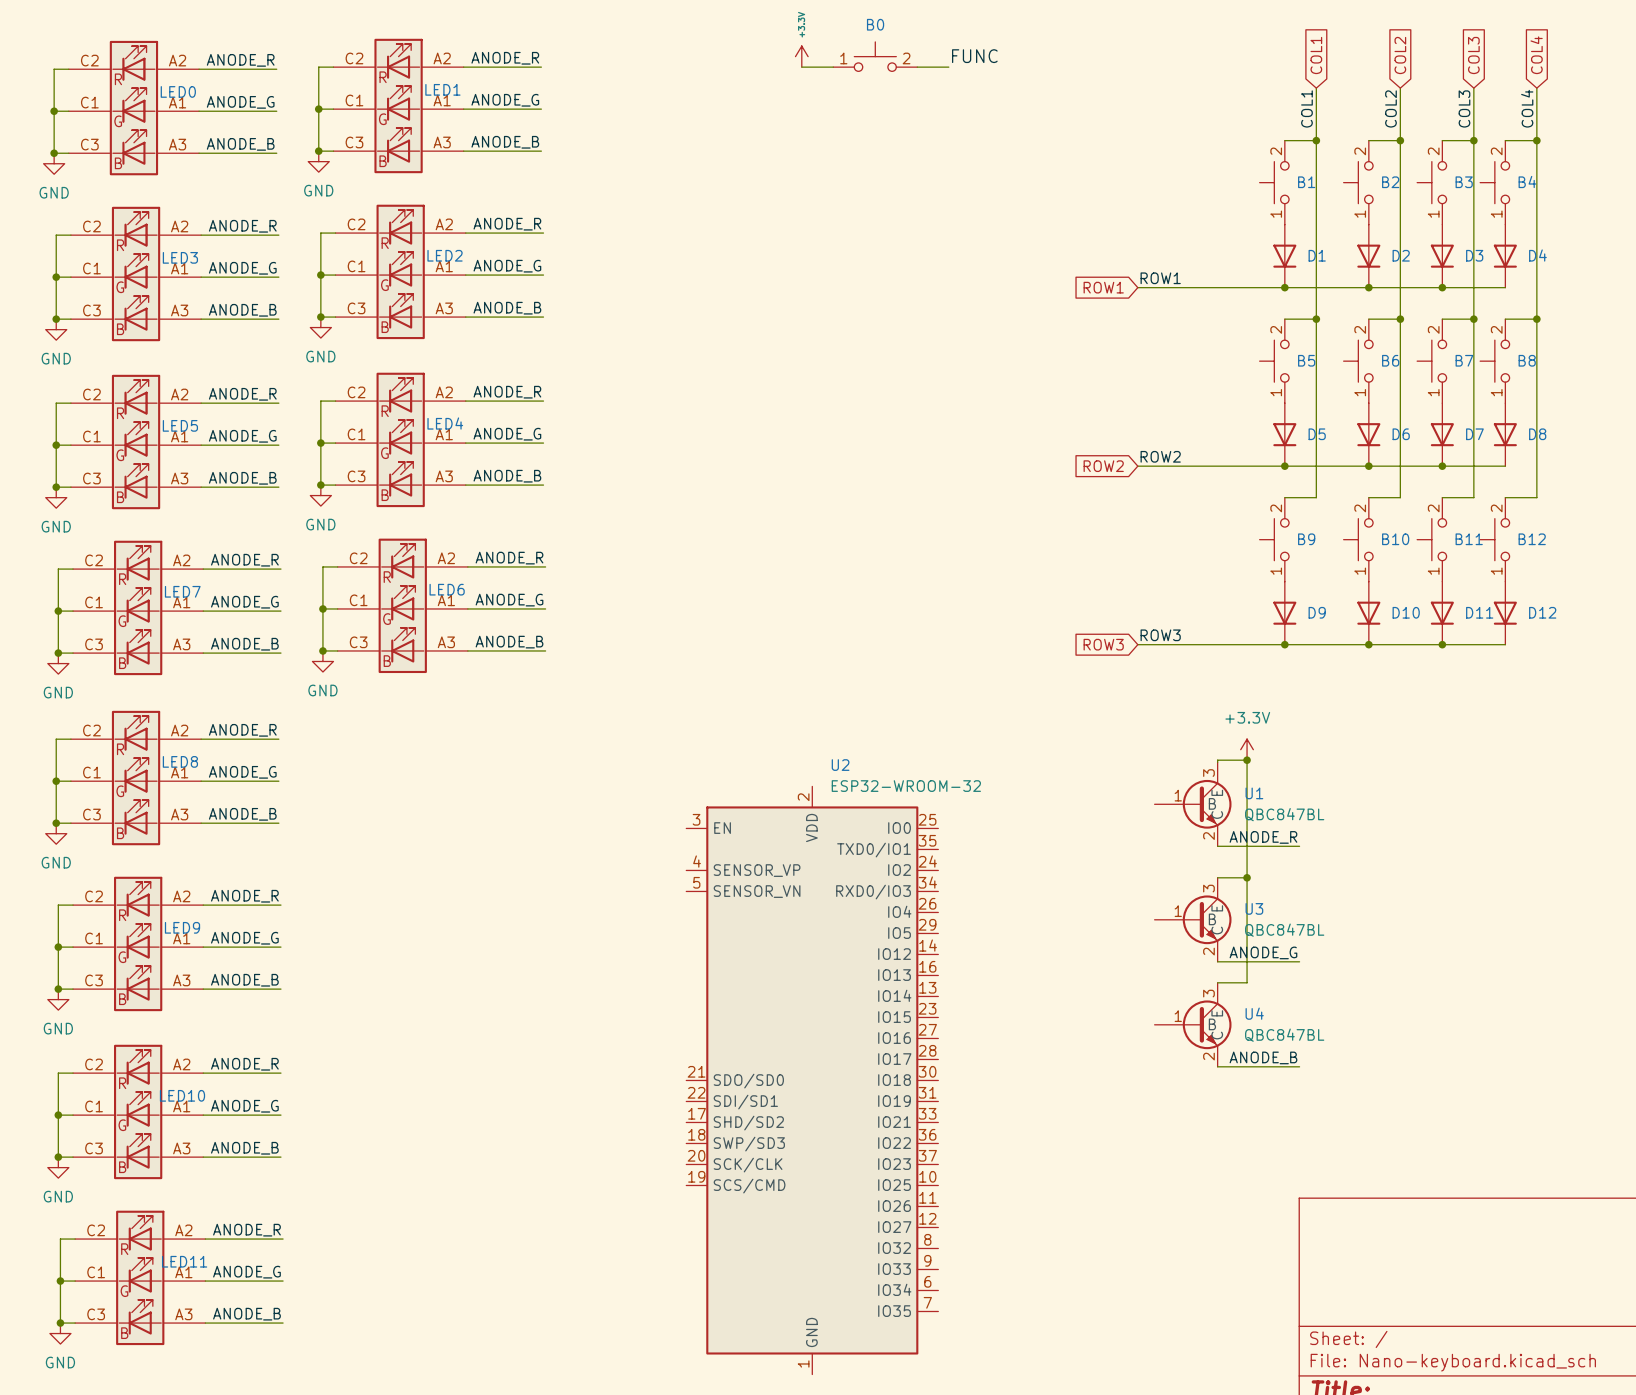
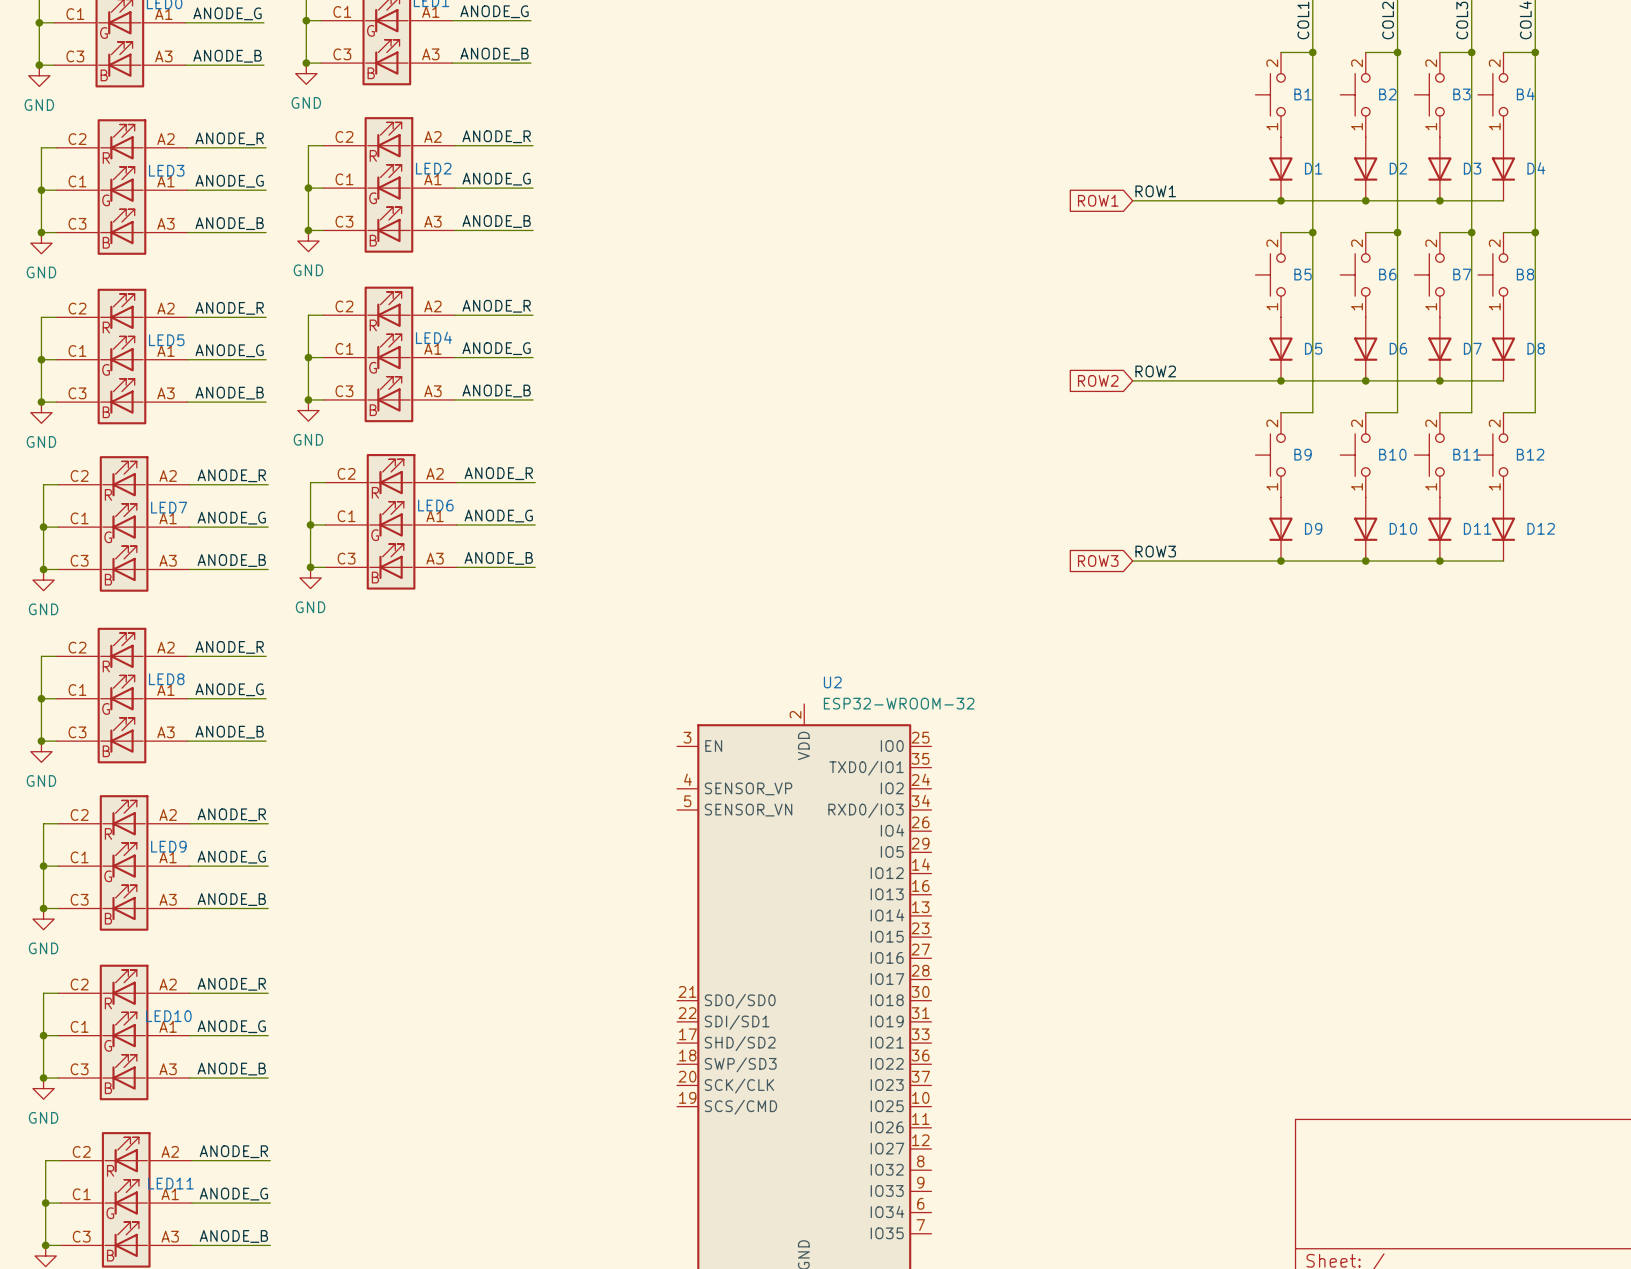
power symbol: +3.3V (1247, 749) -> none
junction: (1247, 760) -> none
wire: (1217, 762) (1217, 760) (1247, 760) (1247, 982) (1217, 982) -> none
U1: QBC847BL (1193, 804) -> none
label: ANODE_R (1263, 837) -> none
wire: (1217, 846) (1299, 846) -> none
wire: (1217, 877) (1247, 877) -> none
junction: (1247, 877) -> none
U3: QBC847BL (1193, 919) -> none
label: ANODE_G (1263, 952) -> none
wire: (1217, 961) (1299, 961) -> none
U4: QBC847BL (1193, 1024) -> none
label: ANODE_B (1263, 1057) -> none
wire: (1217, 1066) (1299, 1066) -> none

